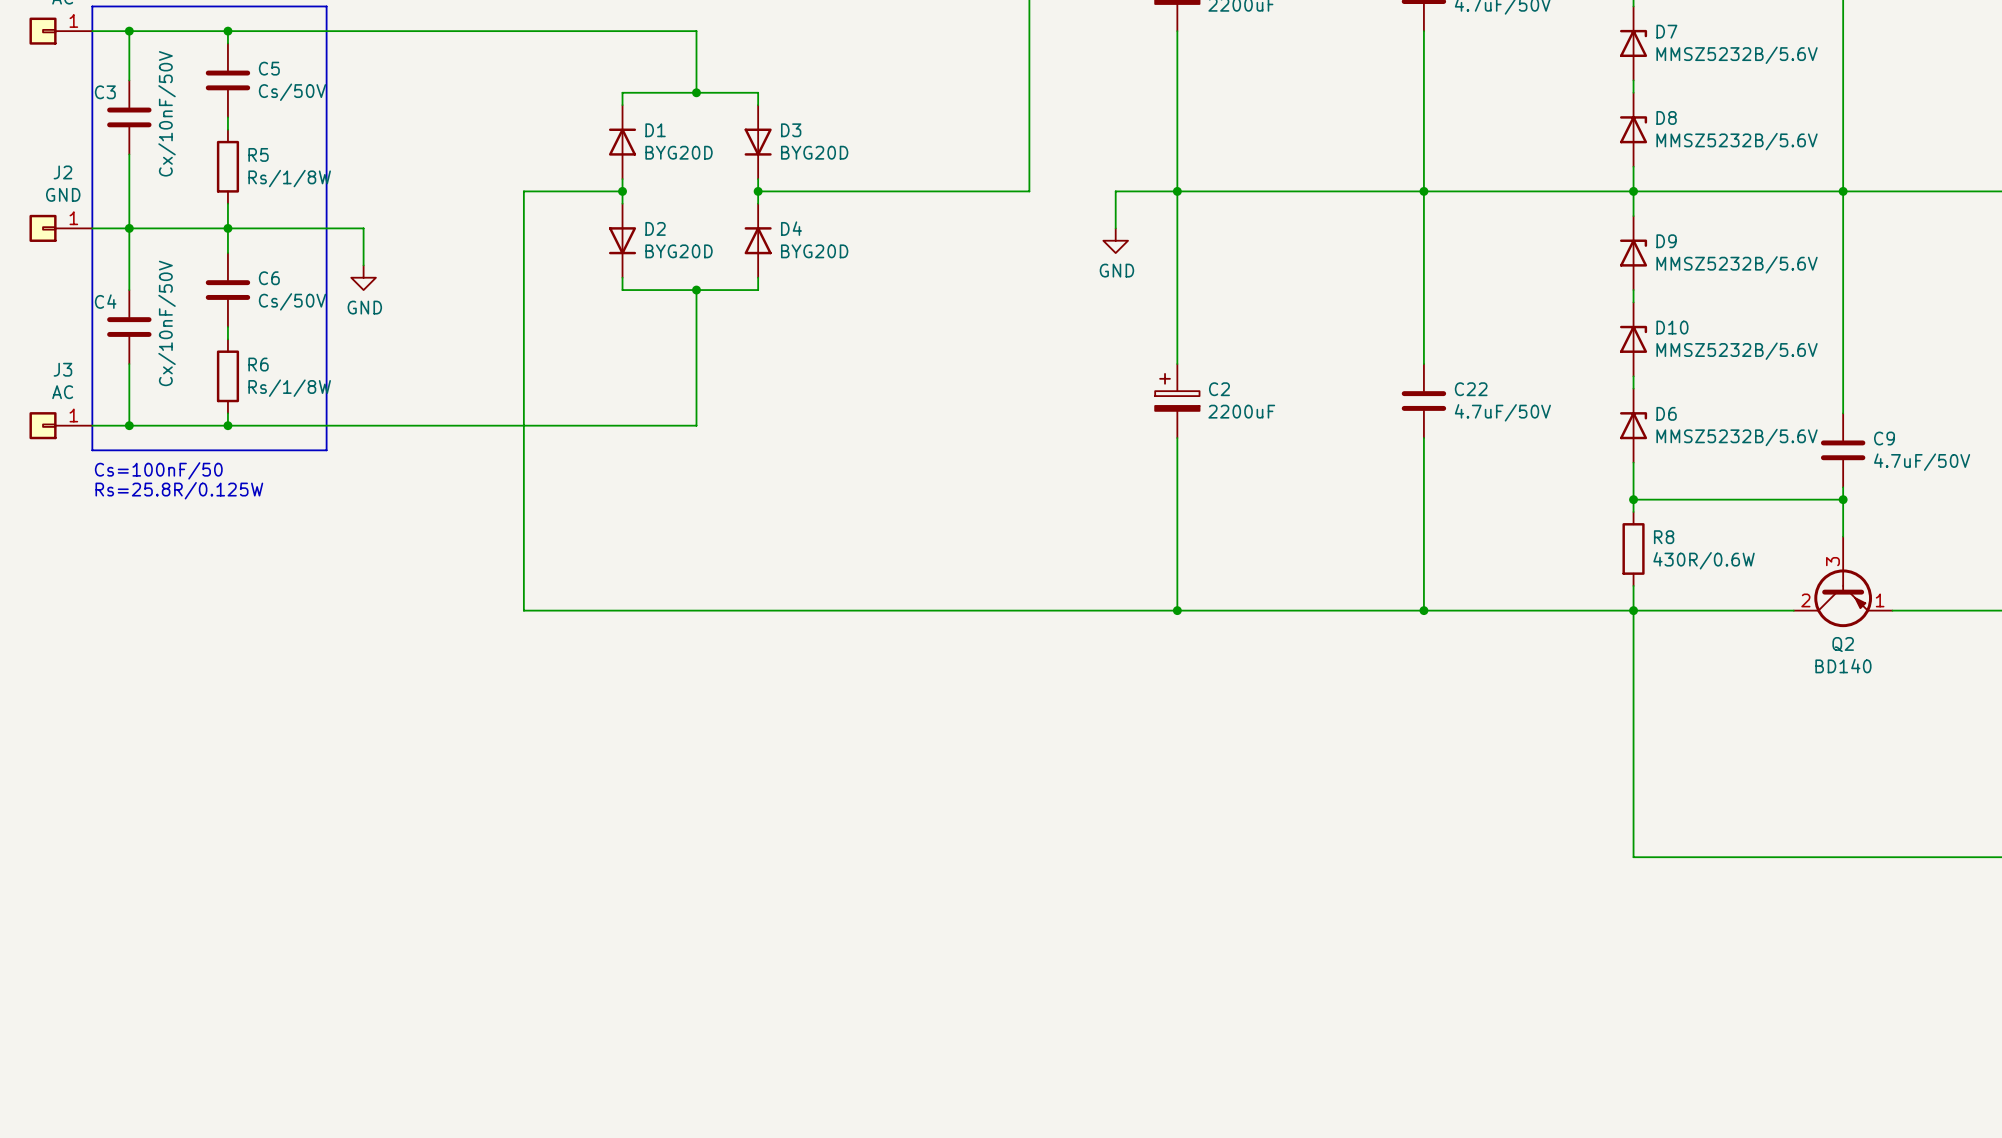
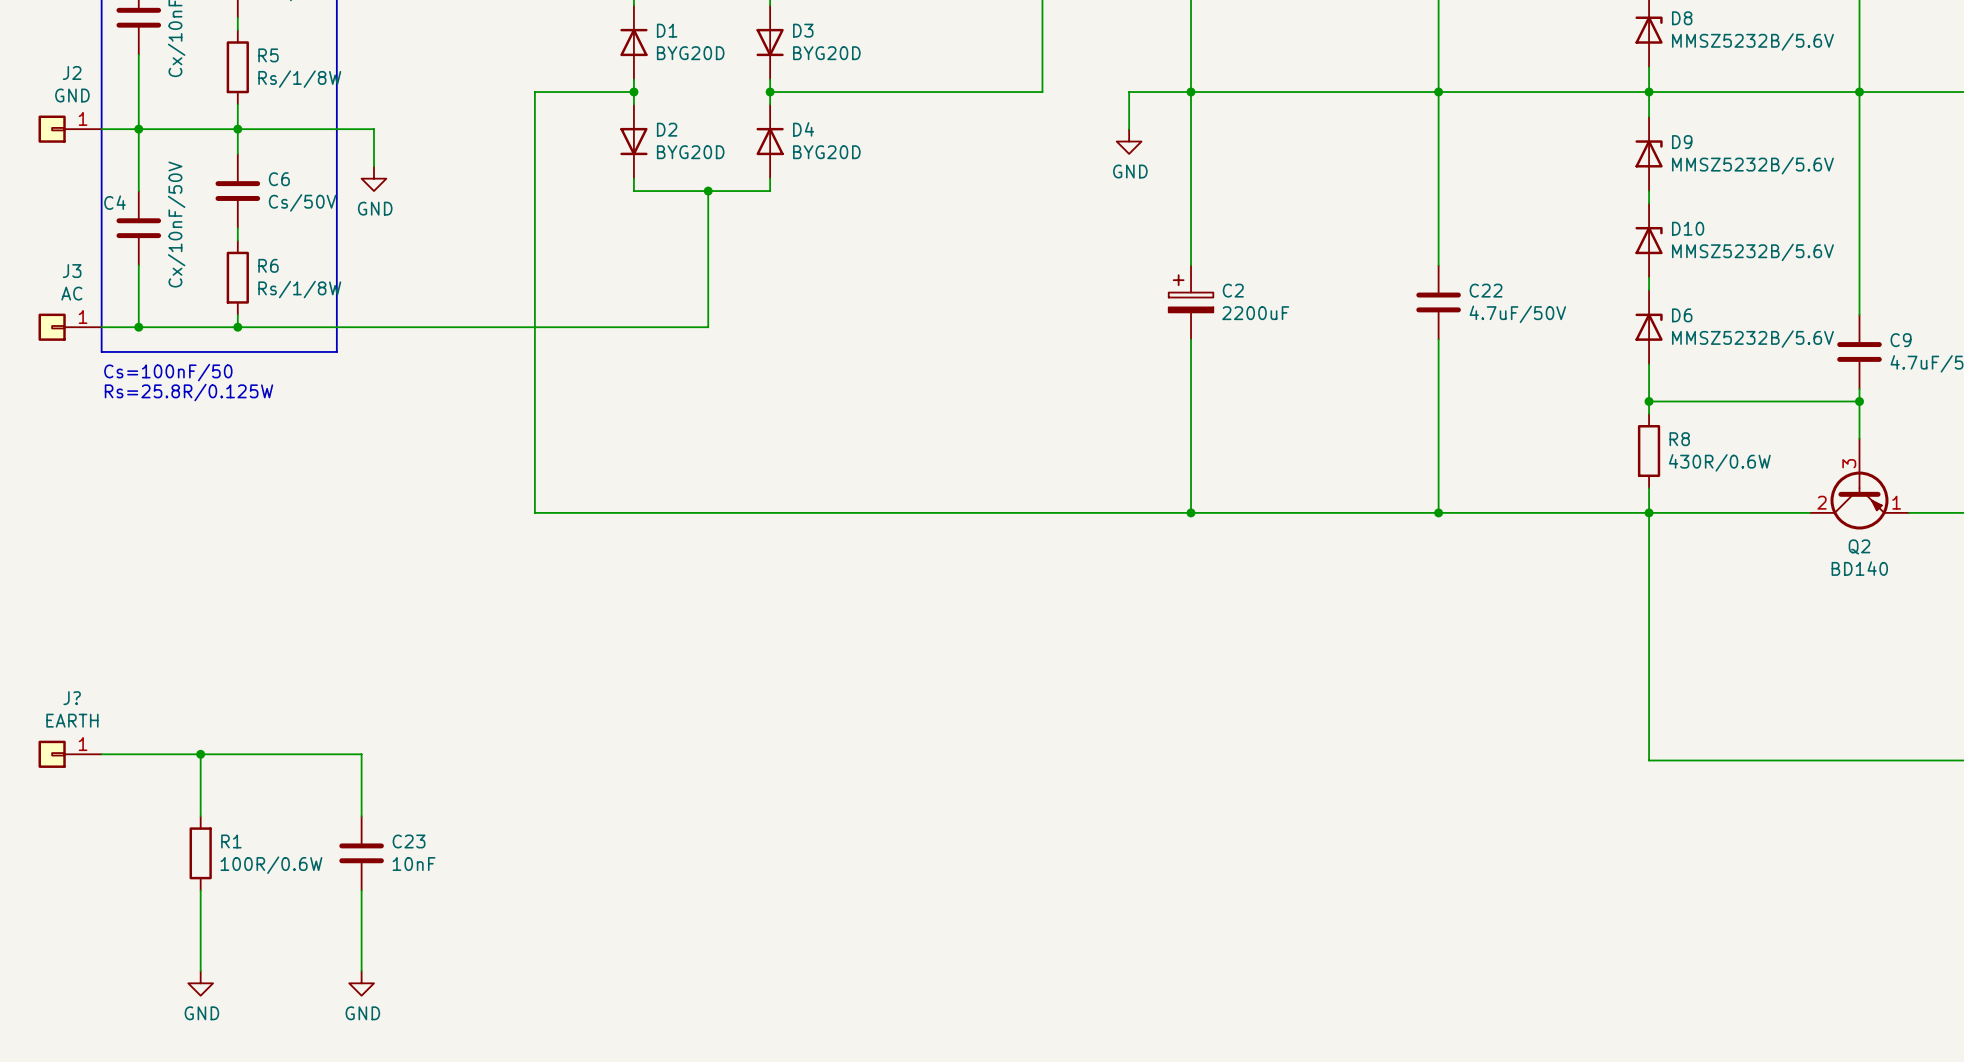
J?: none -> EARTH (70, 754)
wire: none -> (101, 754) (361, 754) (361, 816)
wire: none -> (200, 754) (200, 816)
junction: none -> (200, 754)
R1: none -> 100R/0.6W (200, 853)
C23: none -> 10nF (361, 853)
wire: none -> (200, 890) (200, 970)
wire: none -> (361, 890) (361, 970)
power symbol: none -> GND (200, 983)
power symbol: none -> GND (361, 983)

